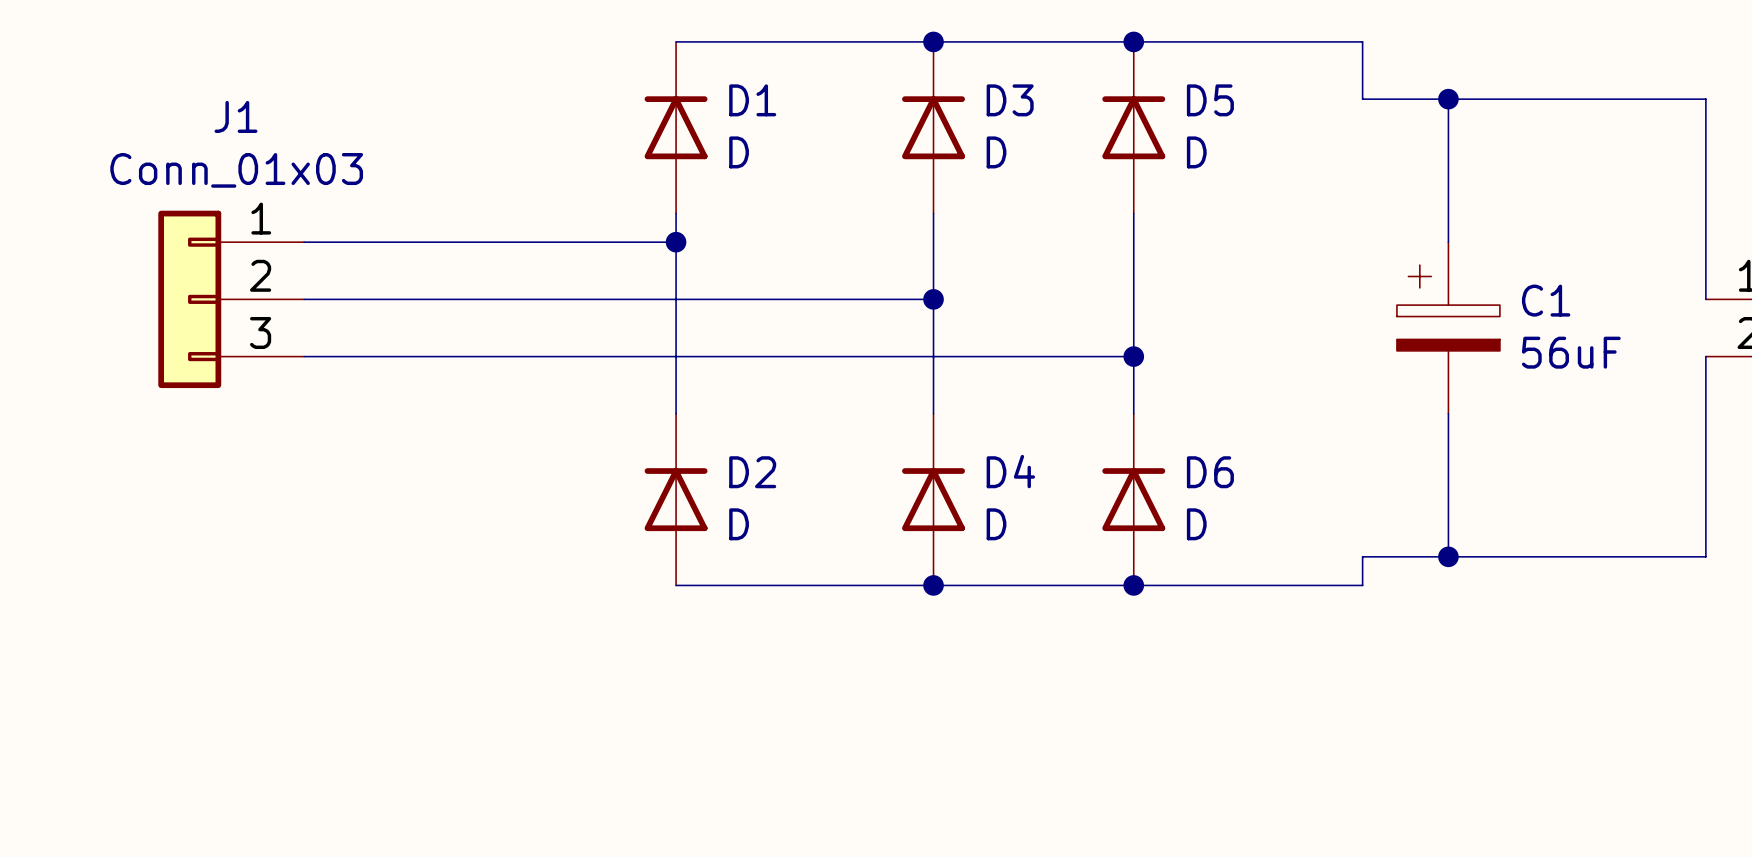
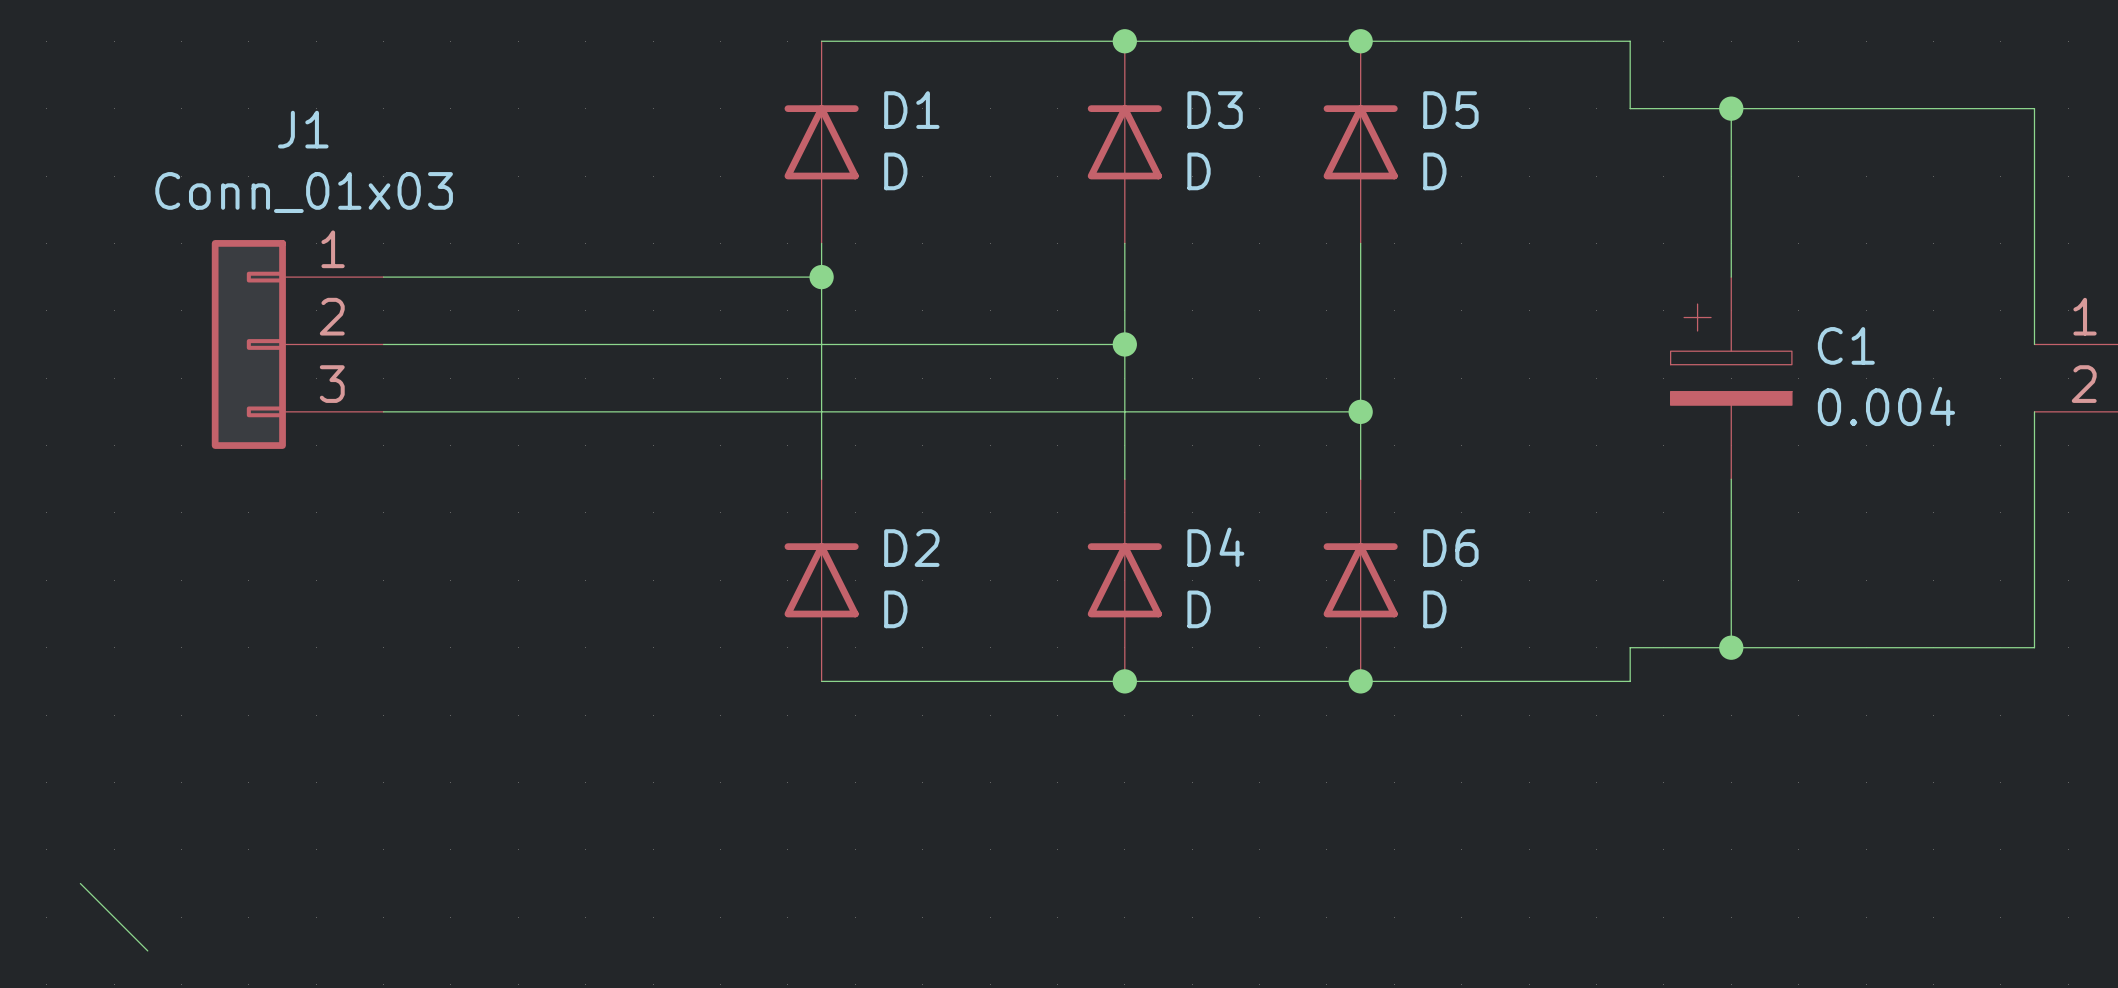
C1 value: 56uF (1571, 352) -> 0.004 (1886, 406)
wire: none -> (80, 883) (147, 950)

